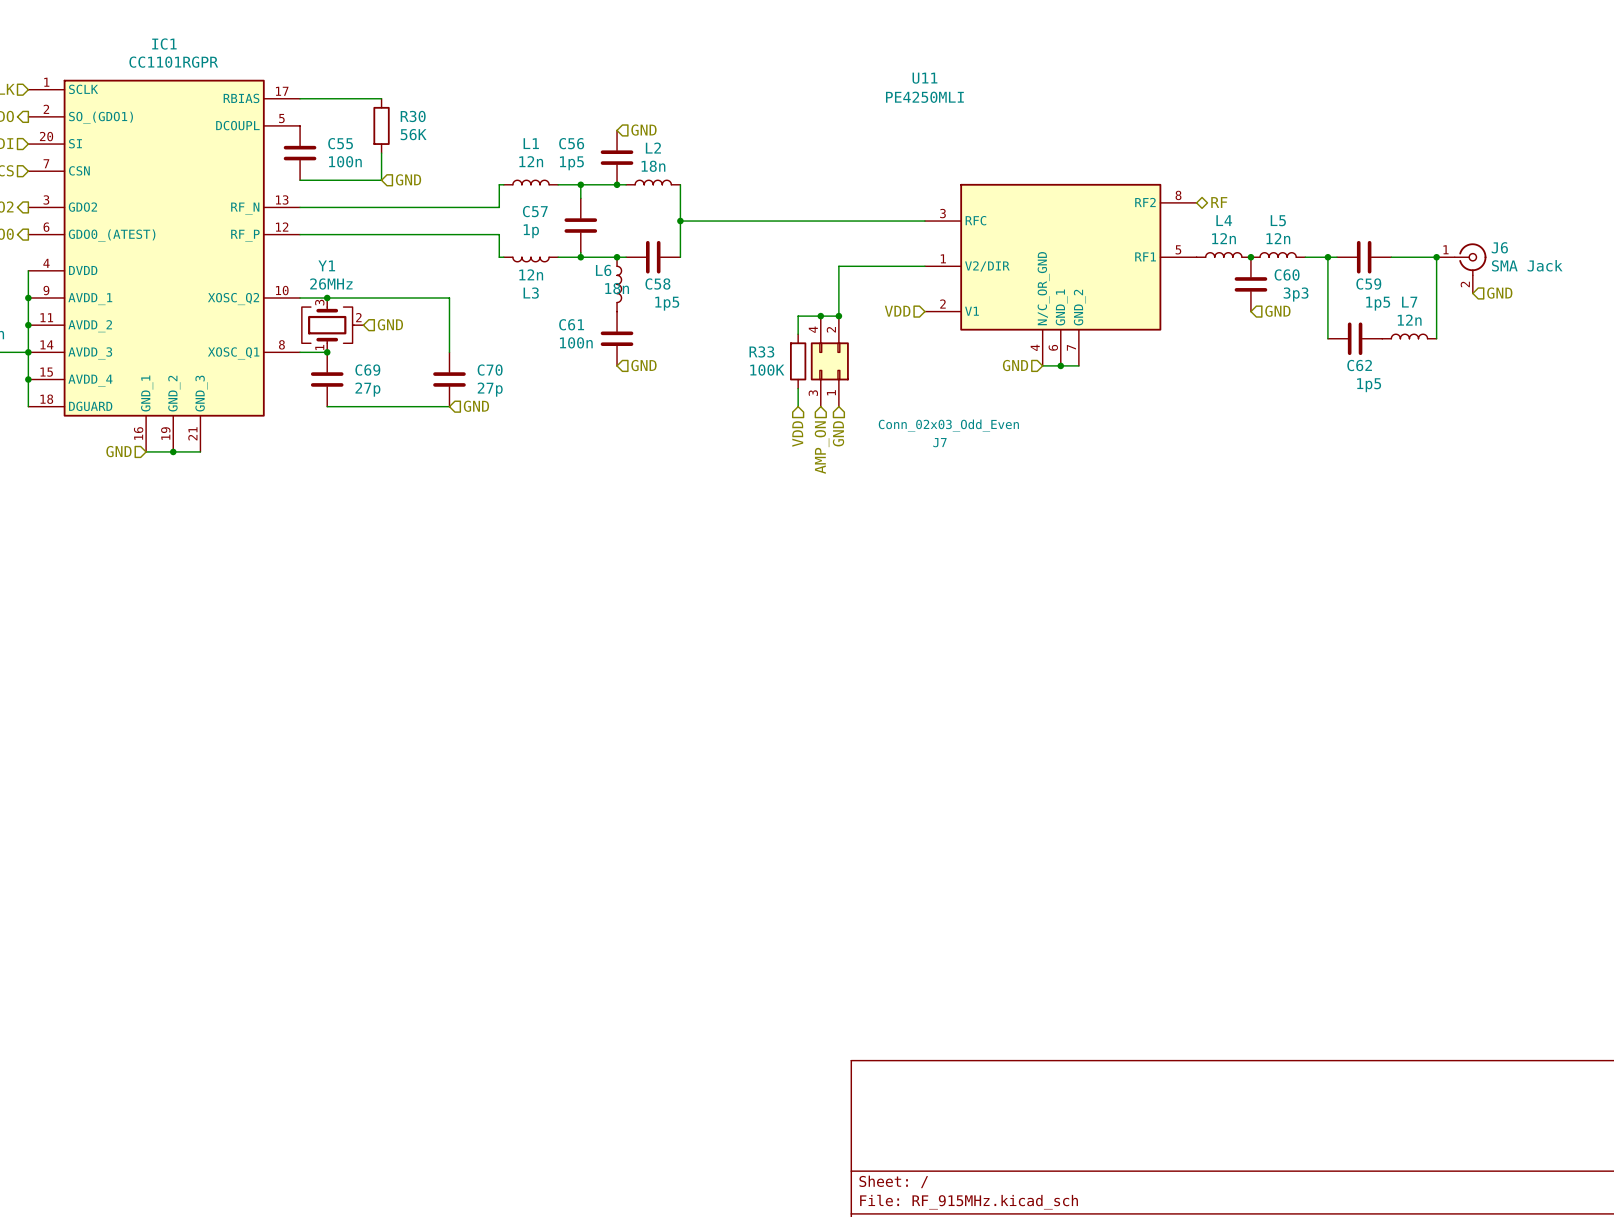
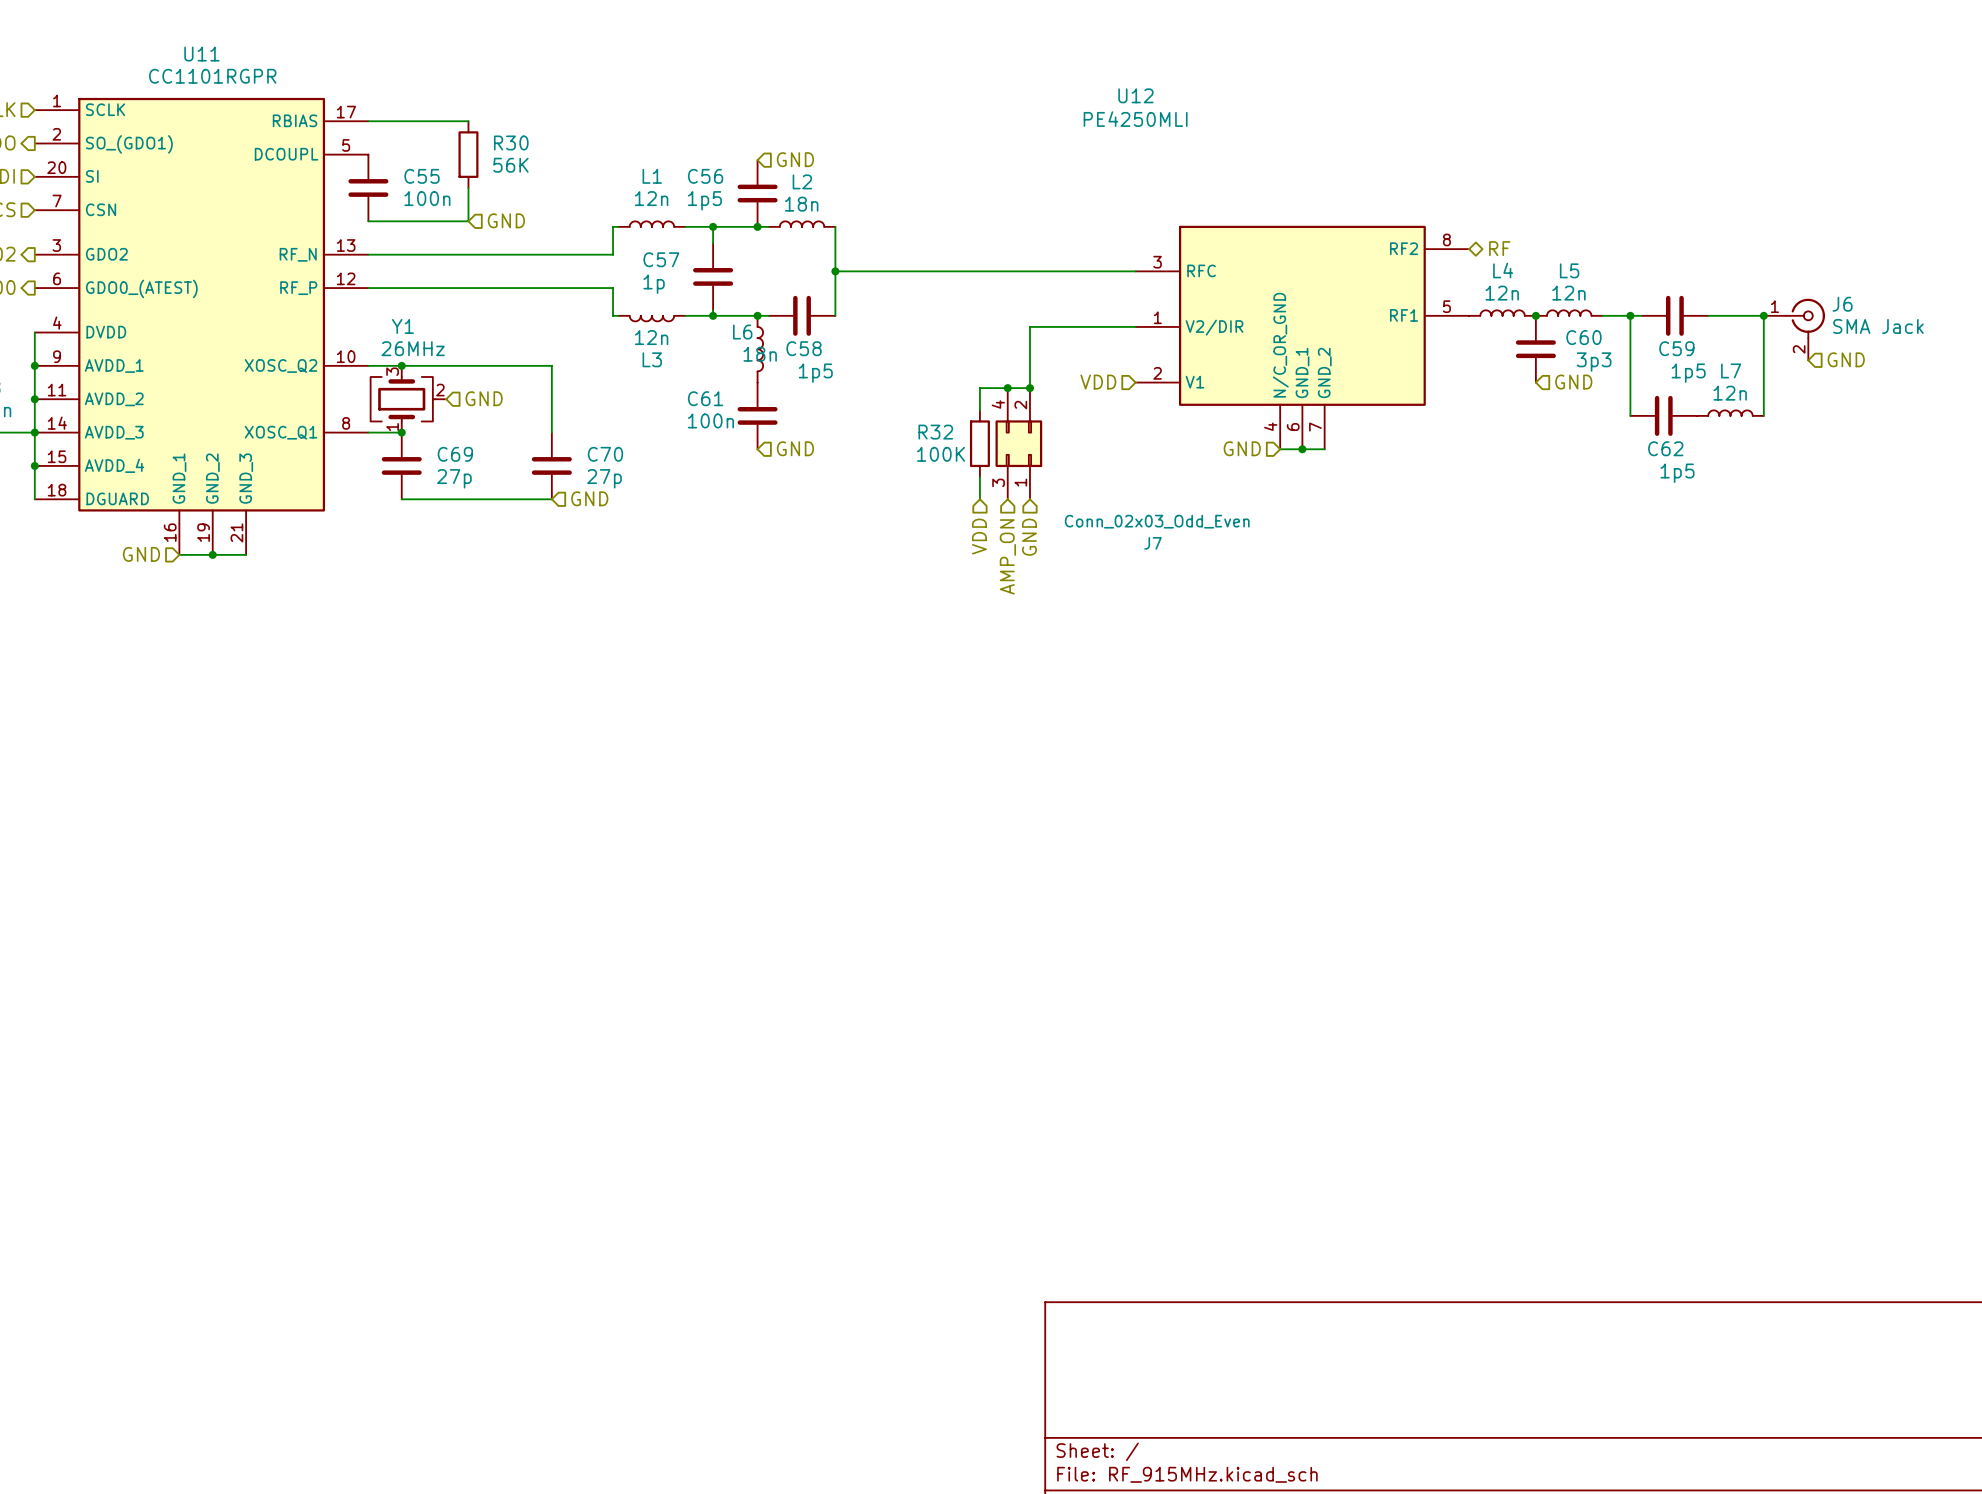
IC1 name: IC1 (164, 44) -> U11 (201, 54)
U11 name: U11 (924, 78) -> U12 (1135, 95)
R33 name: R33 (761, 351) -> R32 (935, 432)

